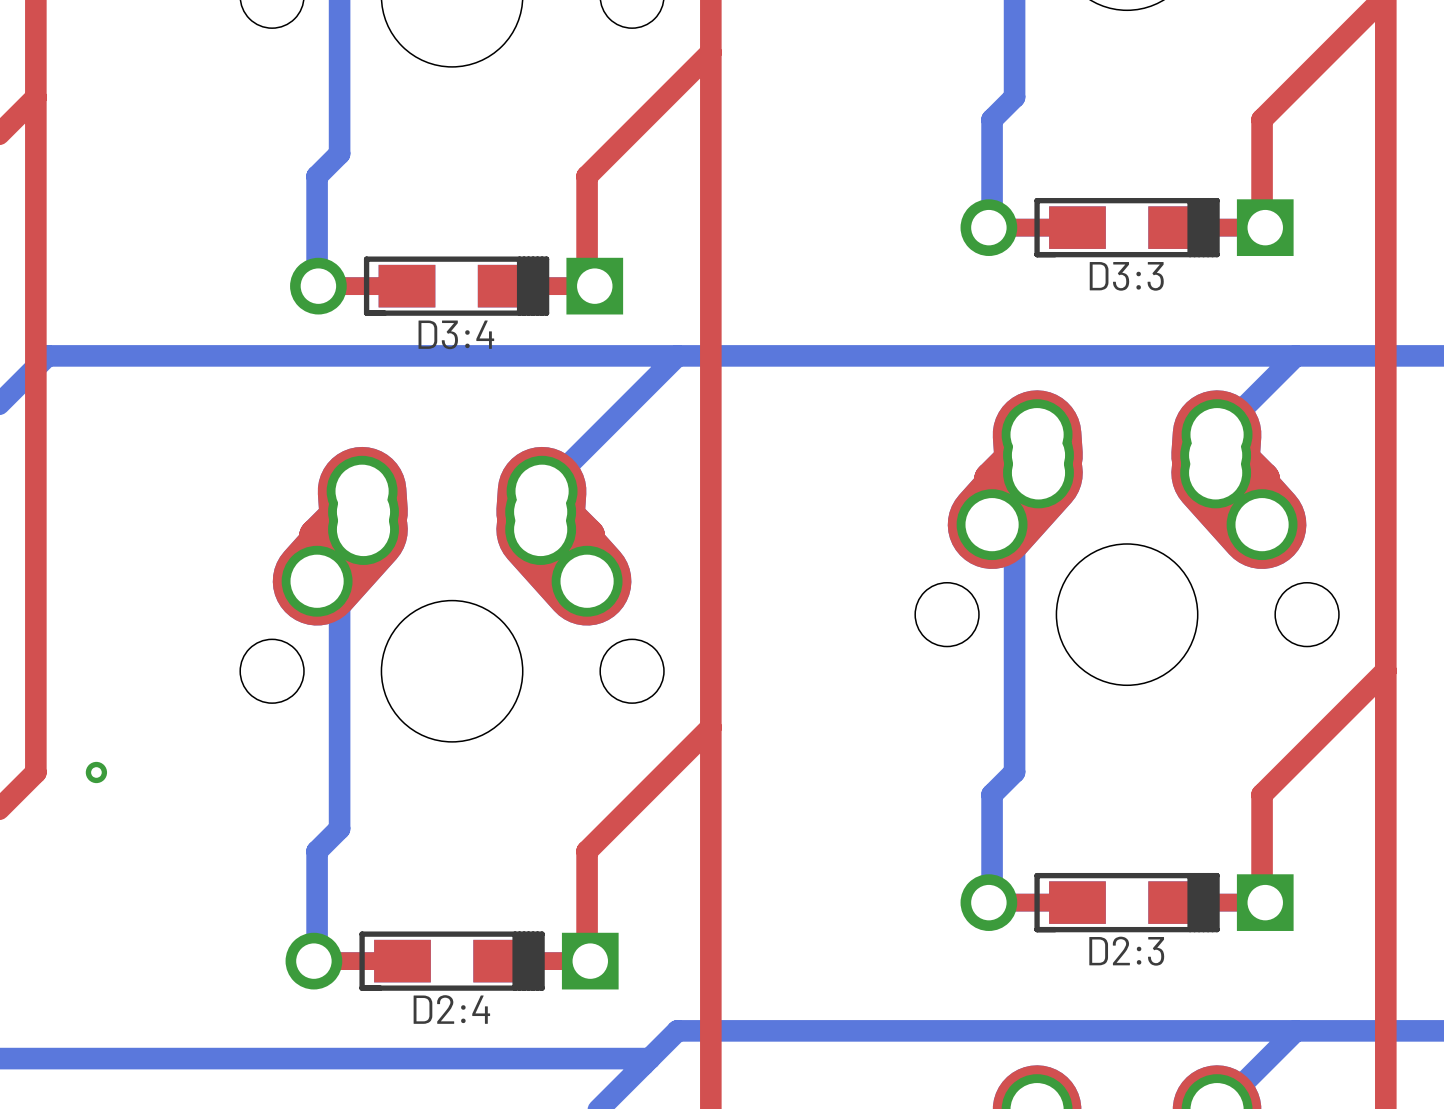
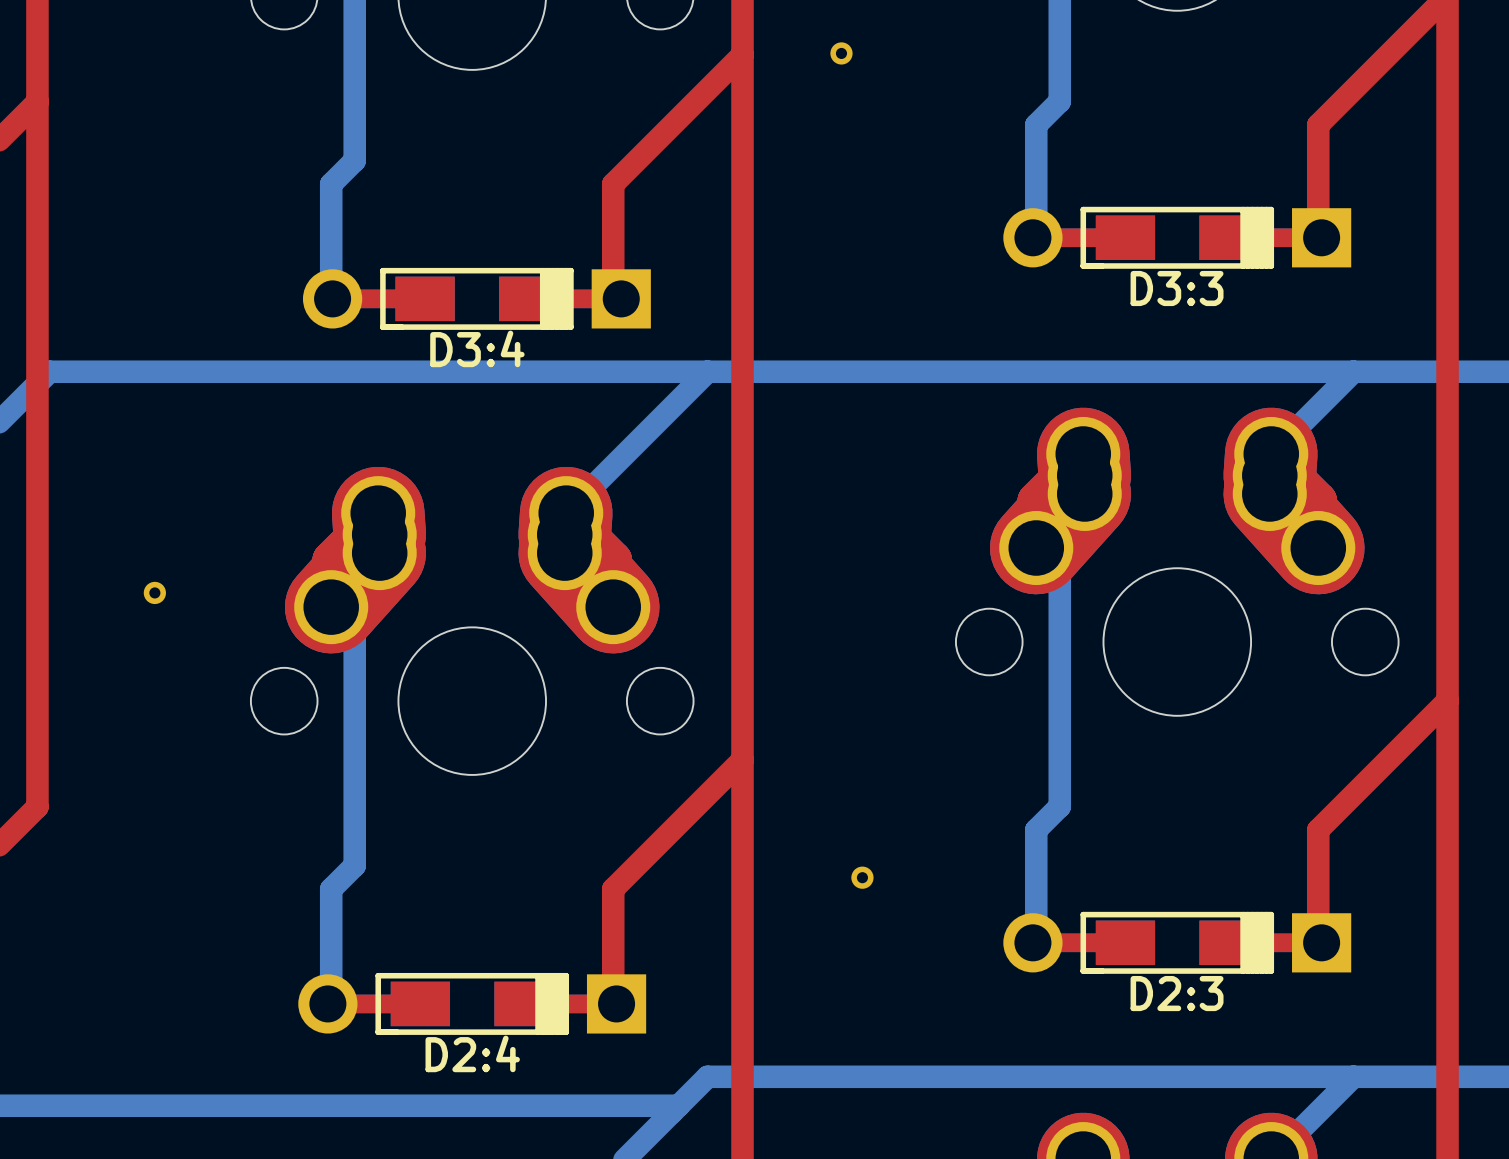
part: none -> (841, 53)
part position: (96, 772) -> (154, 592)
part: none -> (862, 877)

